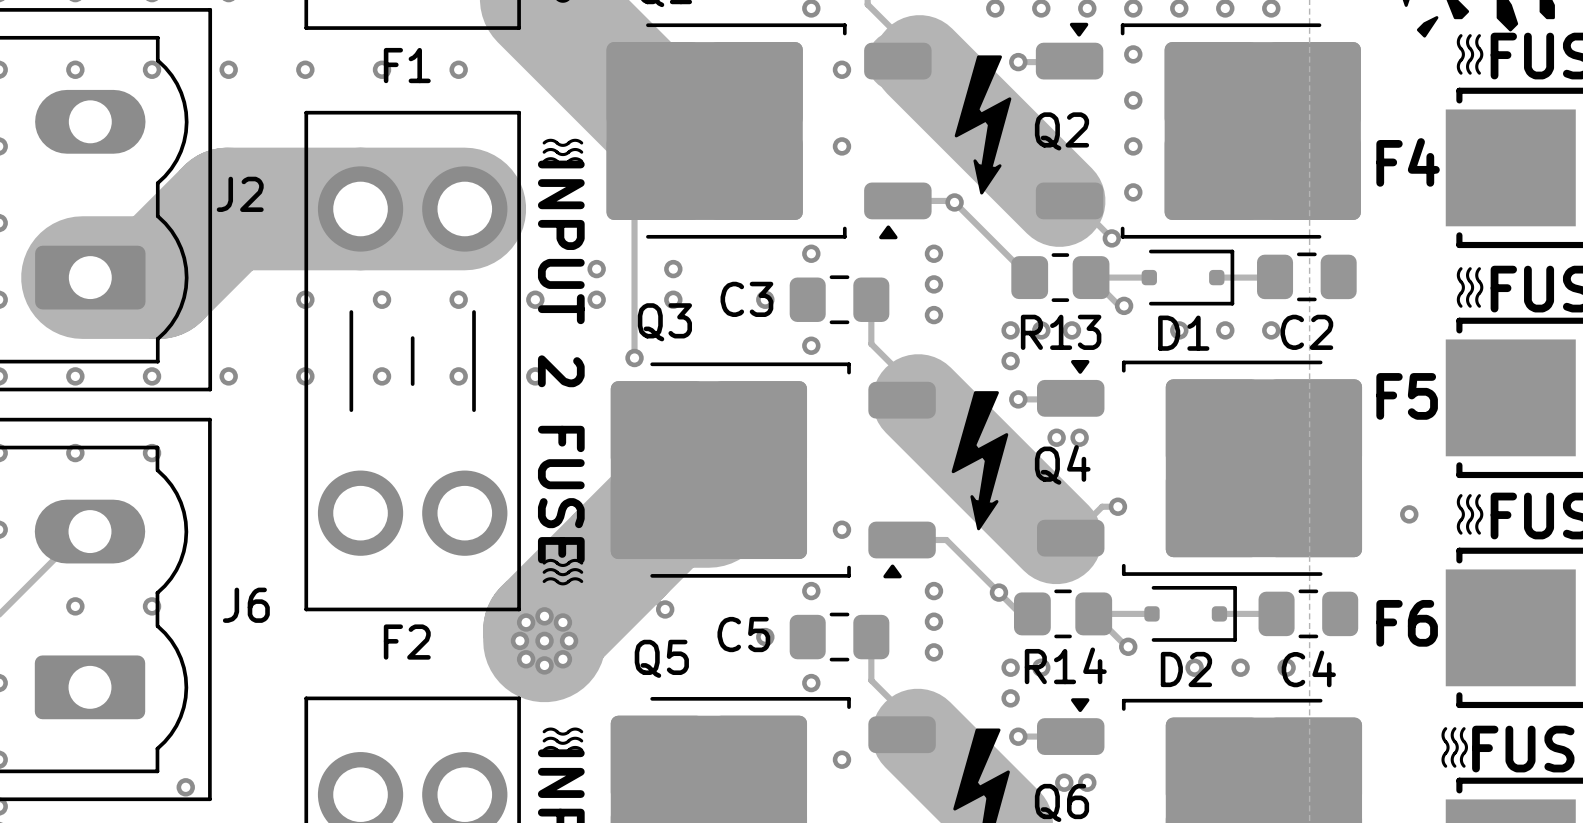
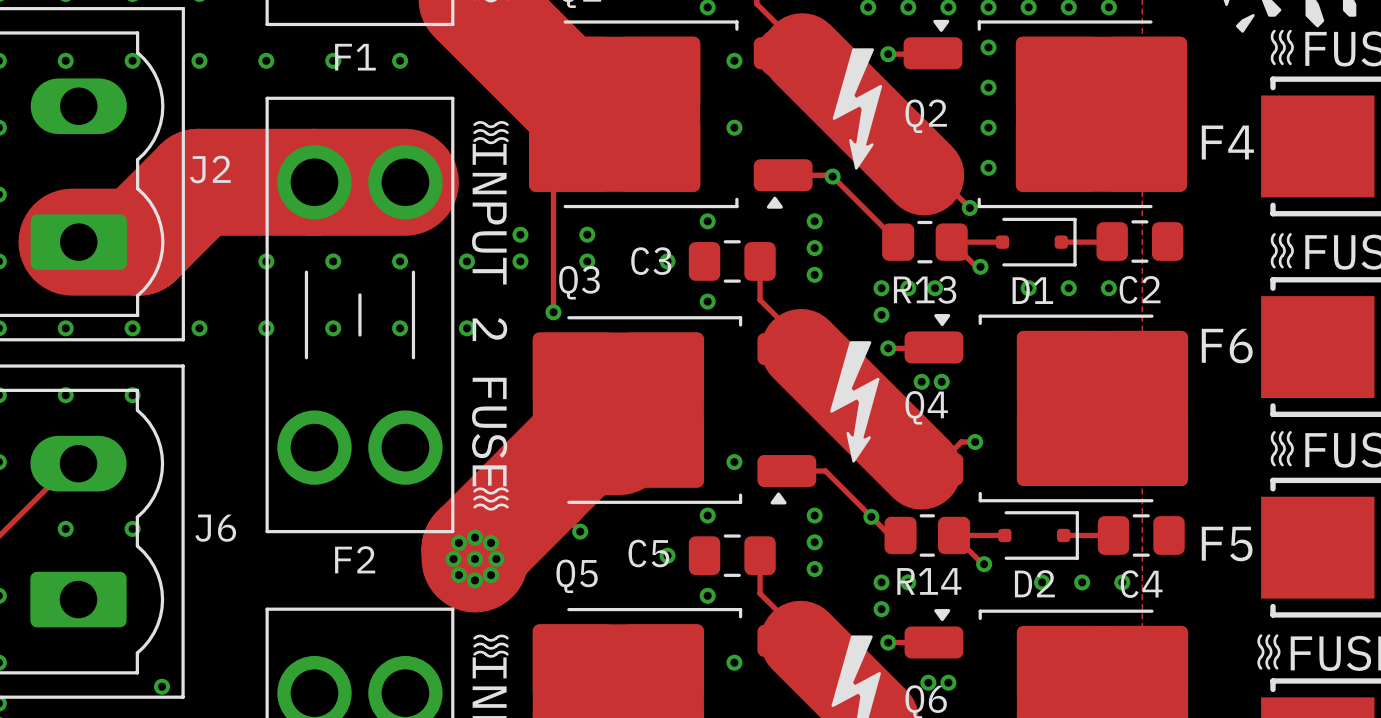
F5 name: F5 (1407, 396) -> F6 (1227, 346)
via: (1409, 514) -> none
F6 name: F6 (1407, 623) -> F5 (1227, 544)

